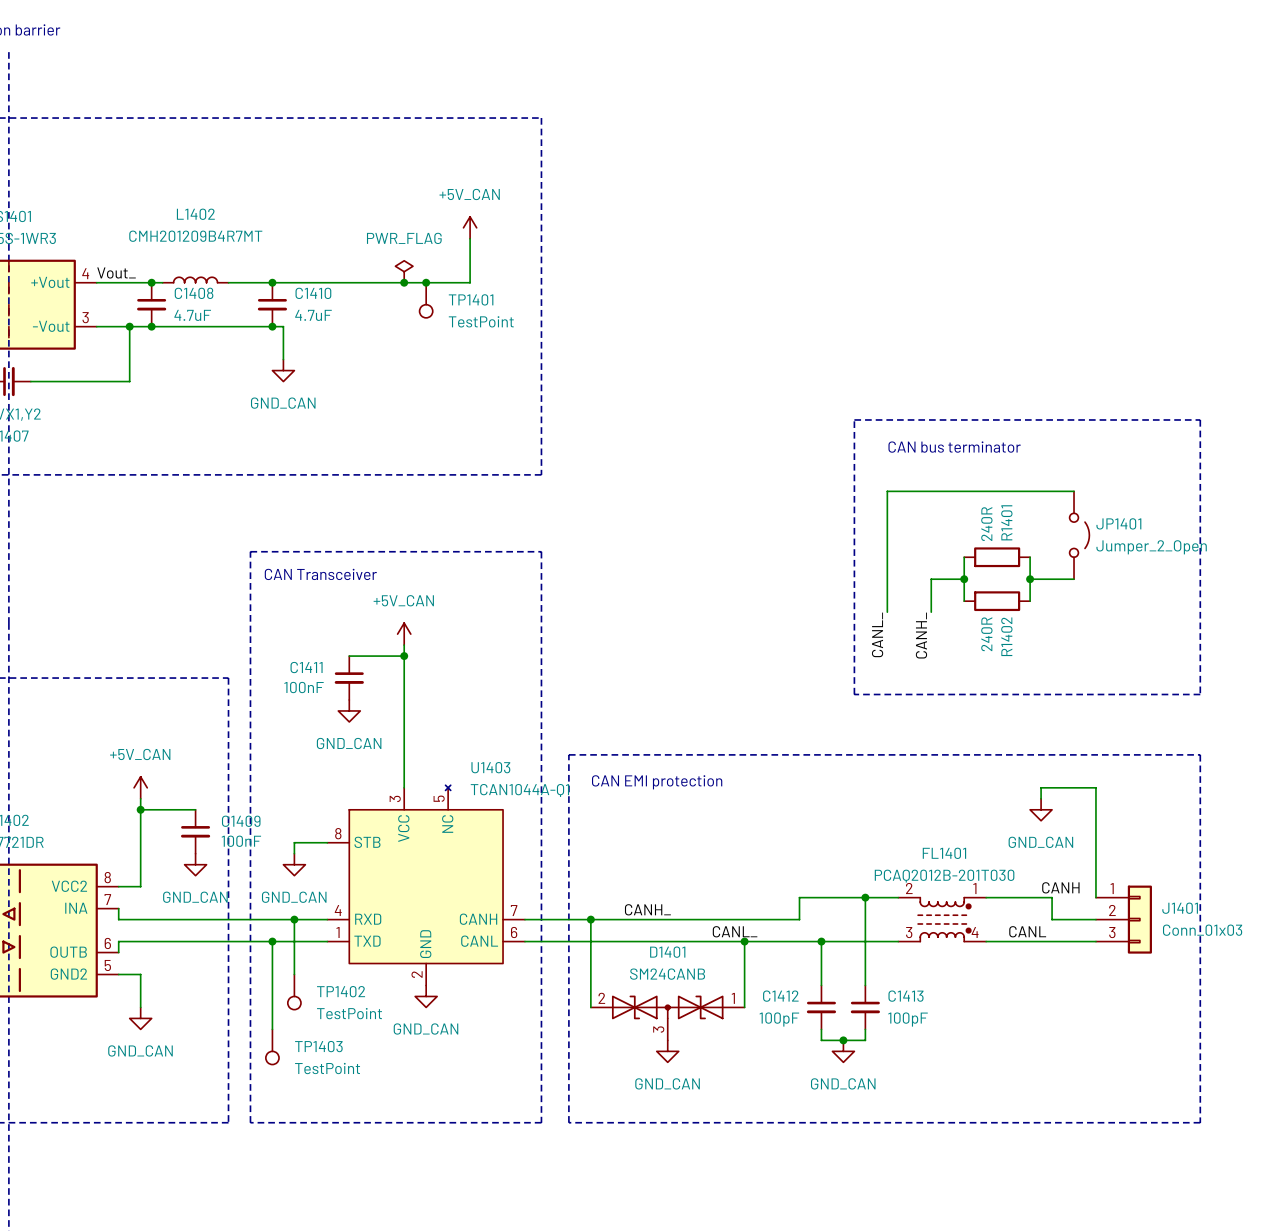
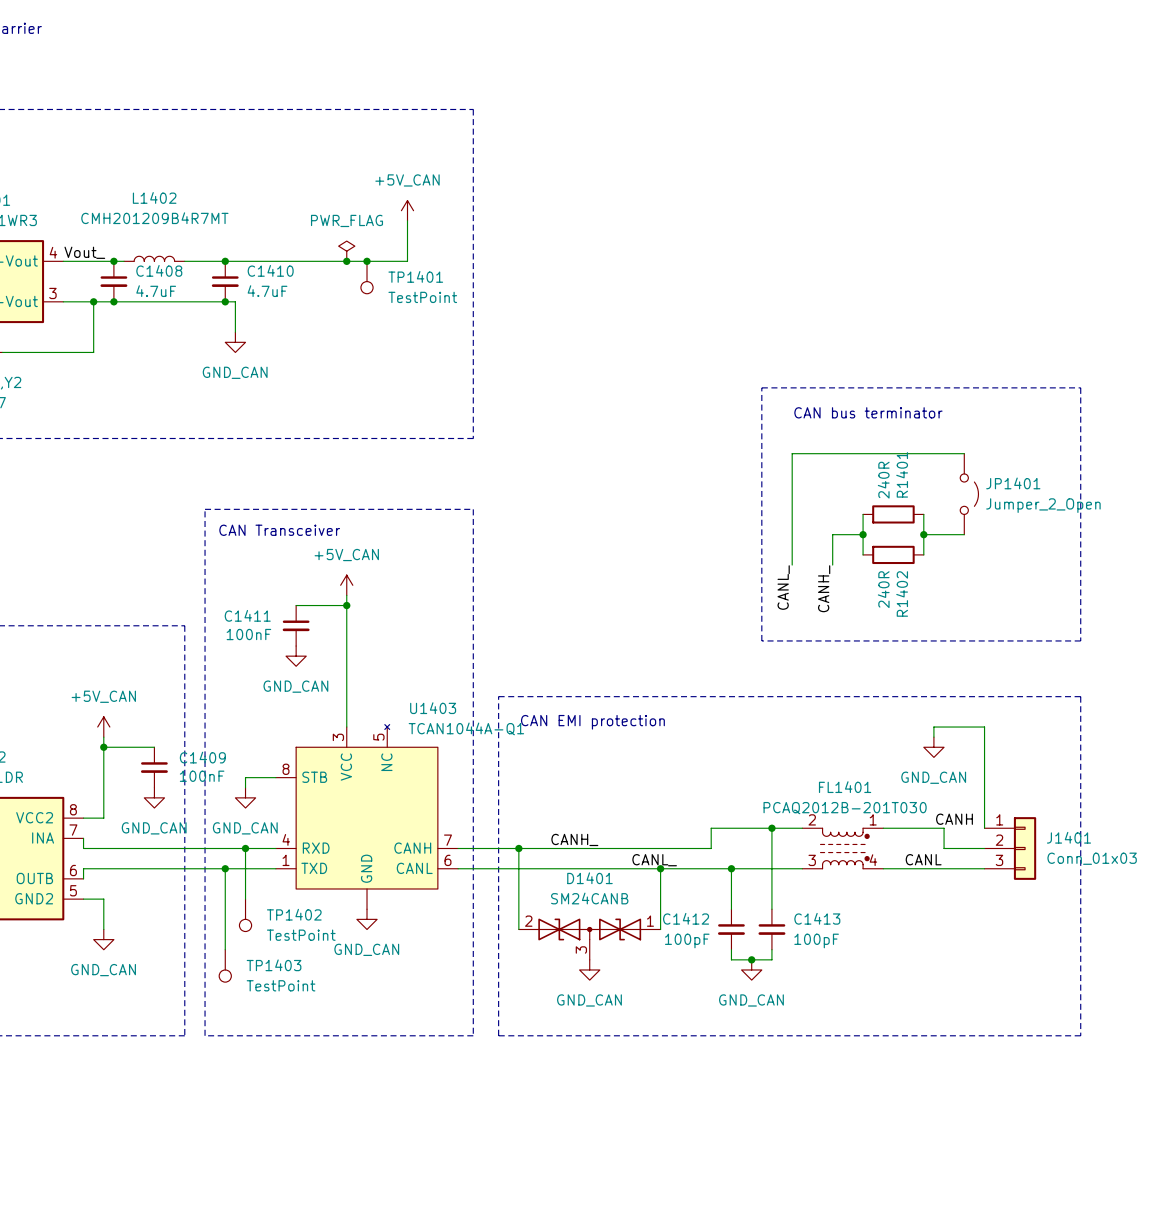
U1403 pin number: 2 (417, 974) -> none

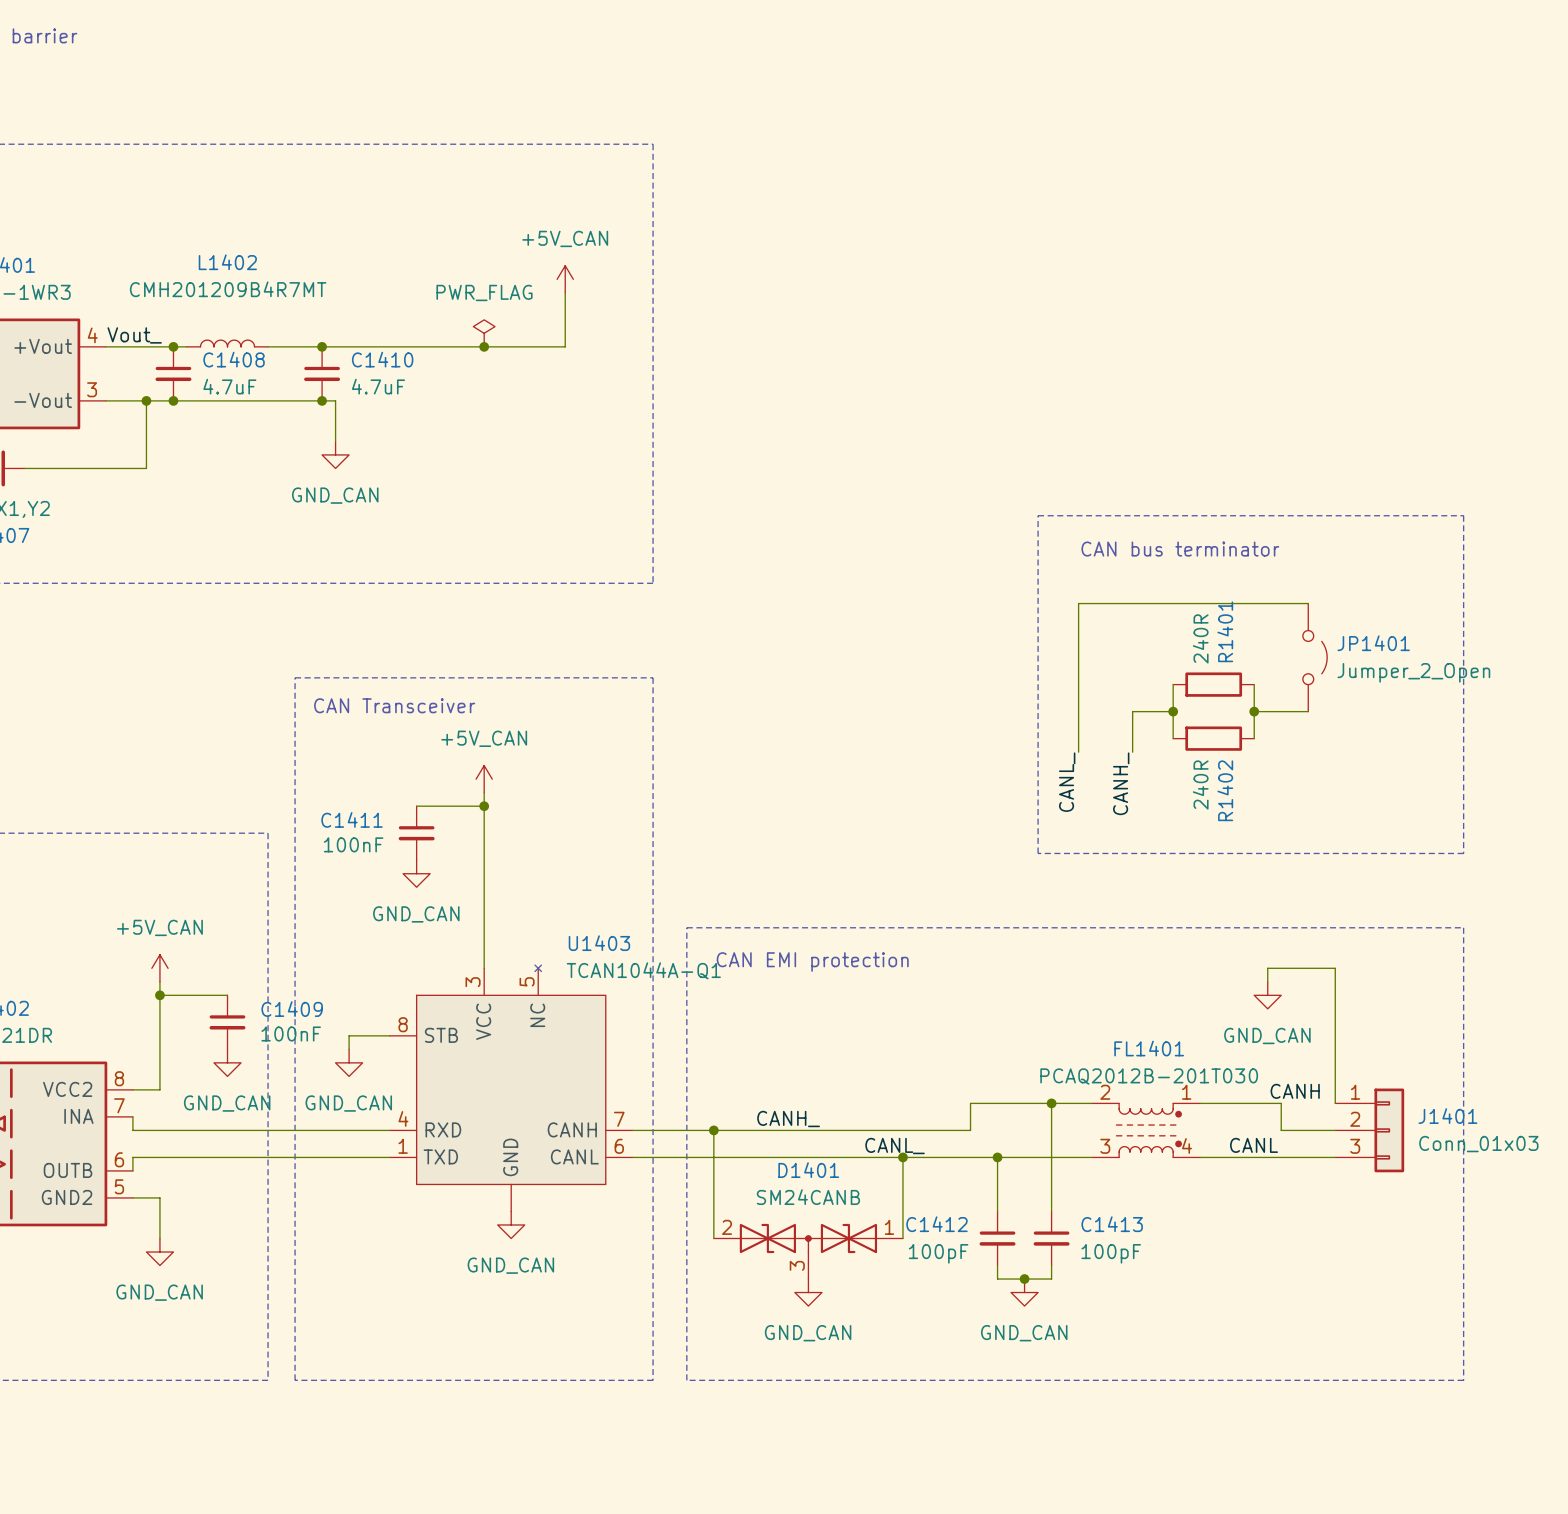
junction: (367, 261) -> none
TP1401: TestPoint (367, 277) -> none
wire: (245, 848) (245, 899) -> none
junction: (245, 848) -> none
wire: (225, 868) (225, 949) -> none
junction: (225, 868) -> none
TP1402: TestPoint (245, 915) -> none
TP1403: TestPoint (225, 965) -> none

